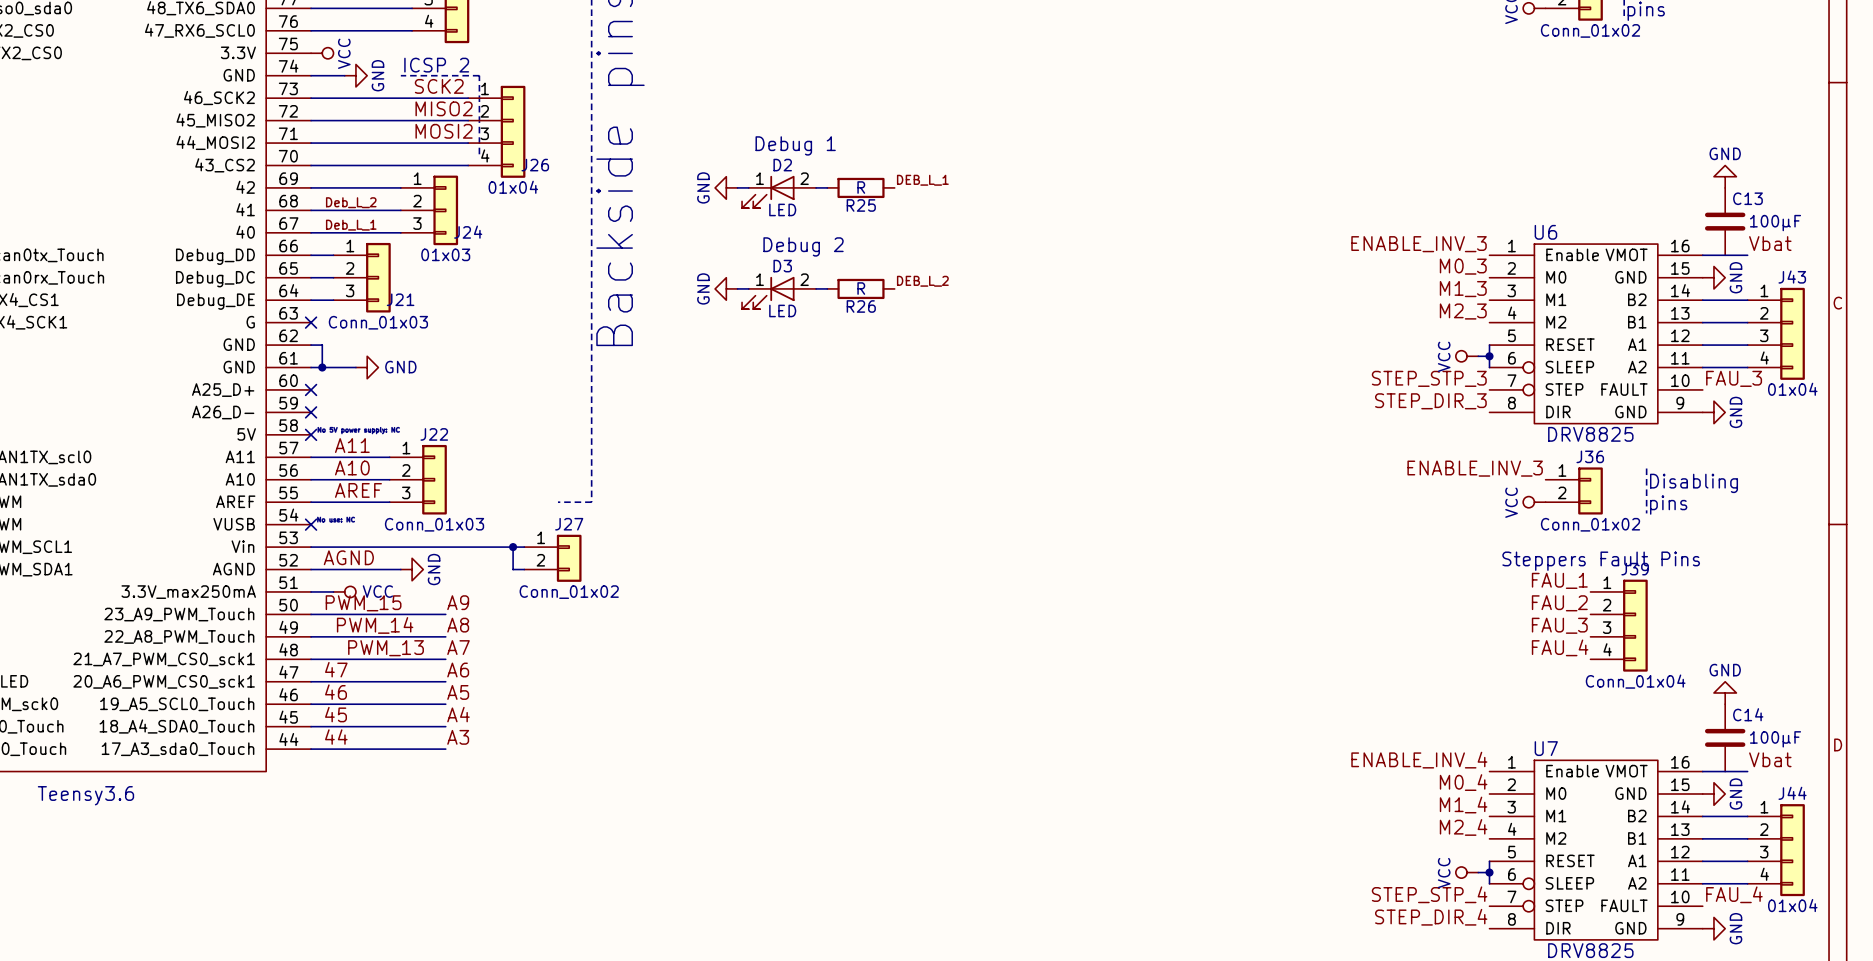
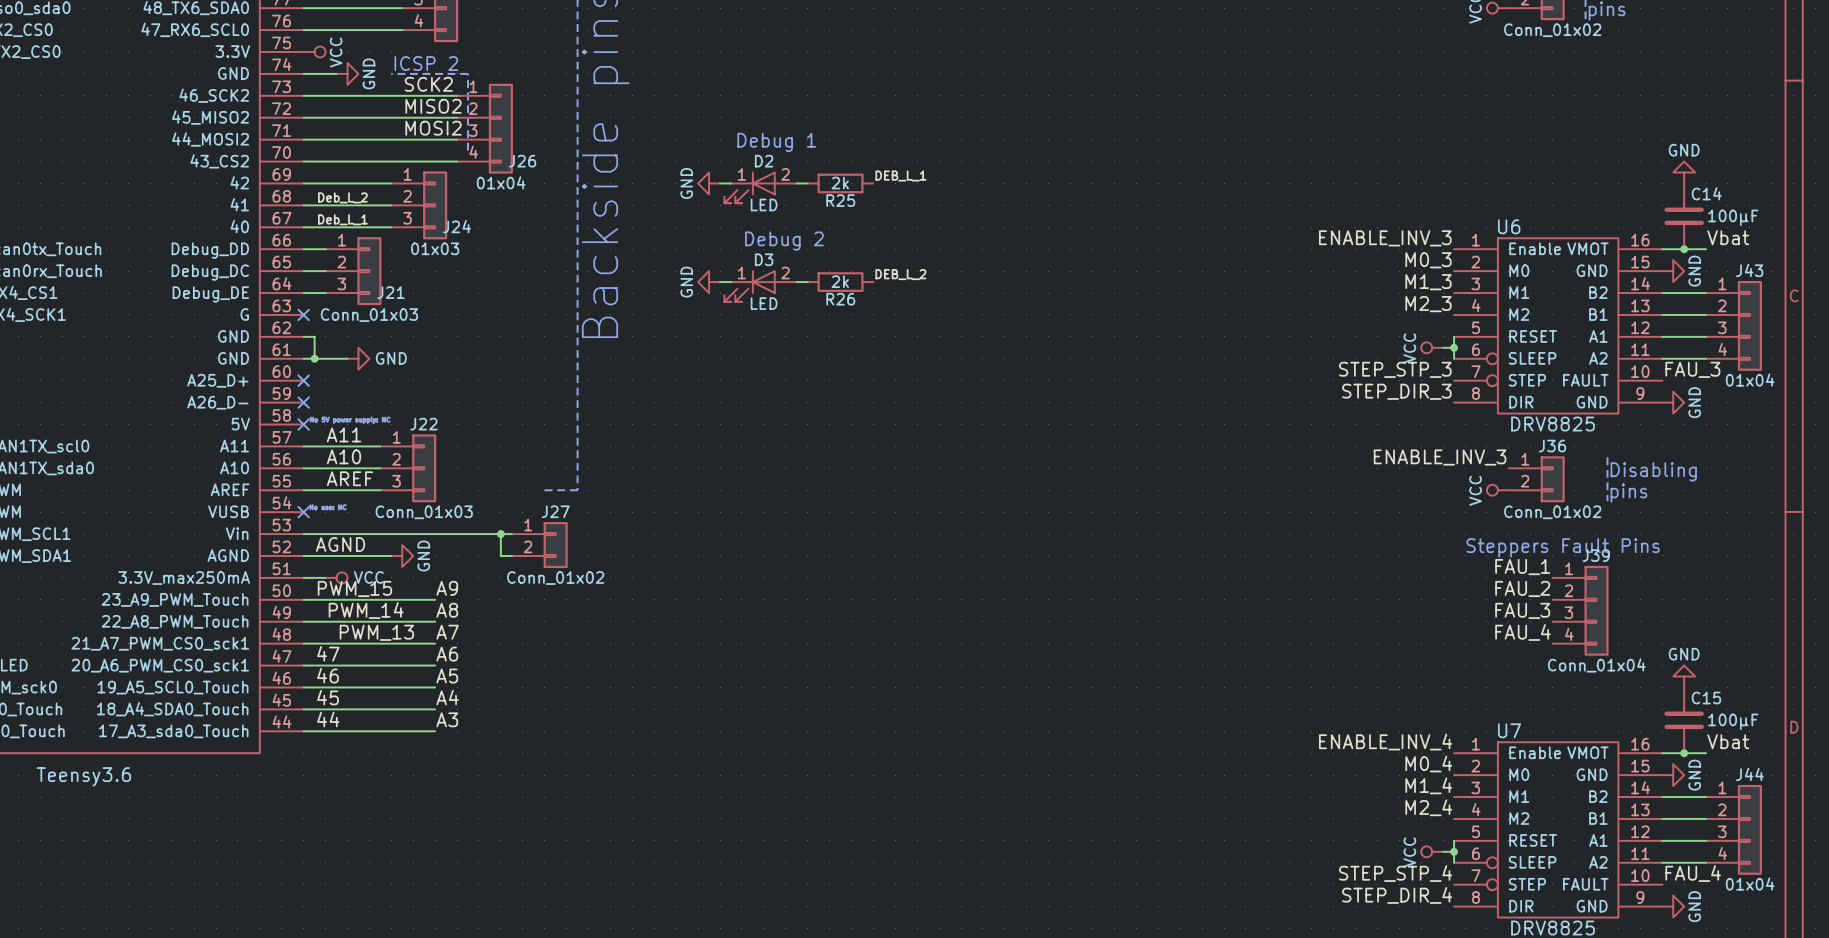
R25 value: R (861, 187) -> 2k (840, 183)
C13 name: C13 (1747, 198) -> C14 (1706, 193)
junction: none -> (1684, 249)
R26 value: R (861, 288) -> 2k (840, 281)
C14 name: C14 (1748, 714) -> C15 (1706, 698)
junction: none -> (1684, 753)

